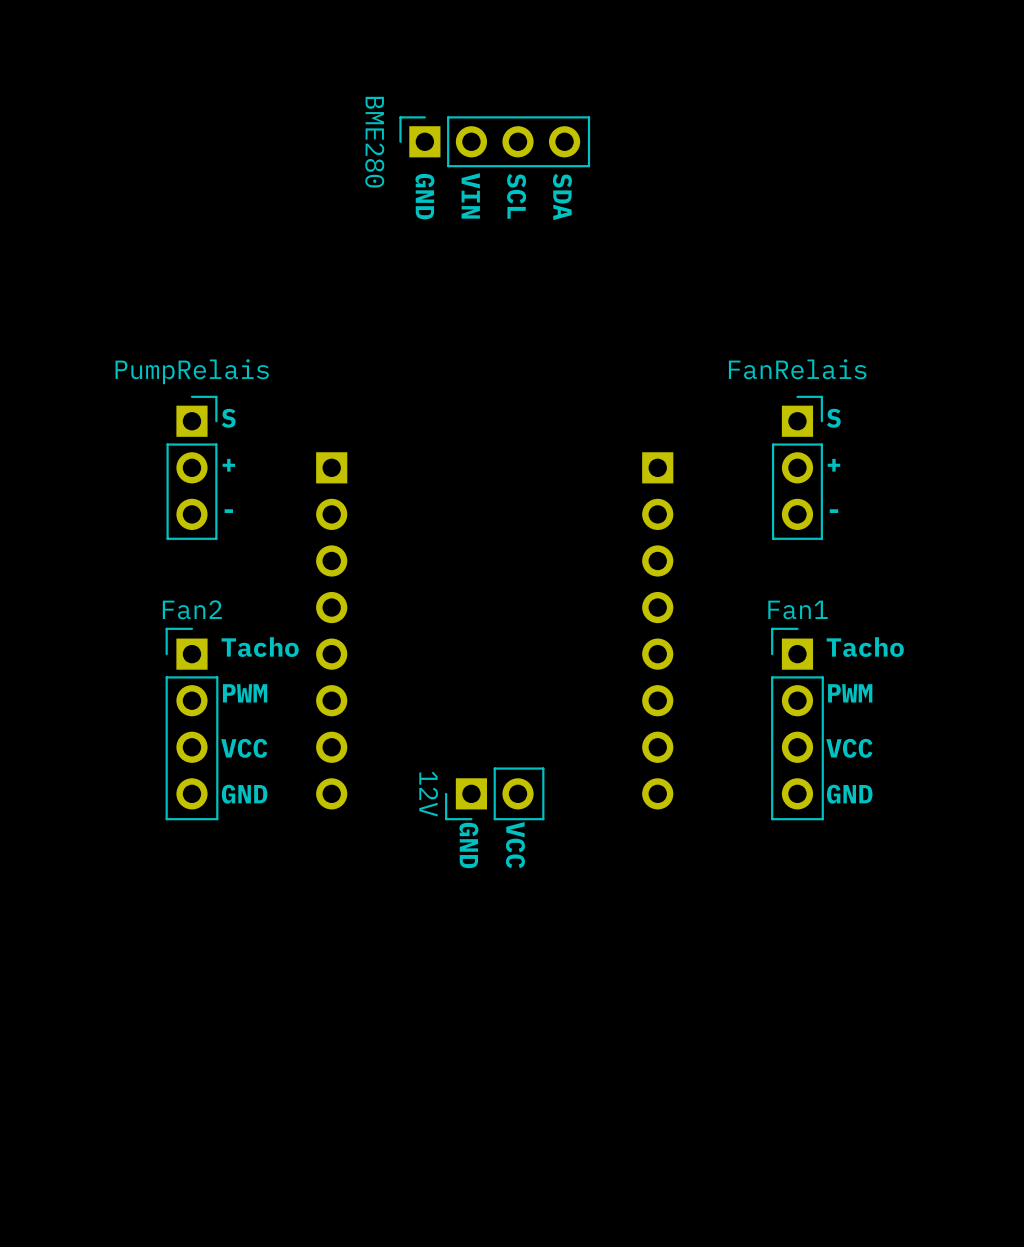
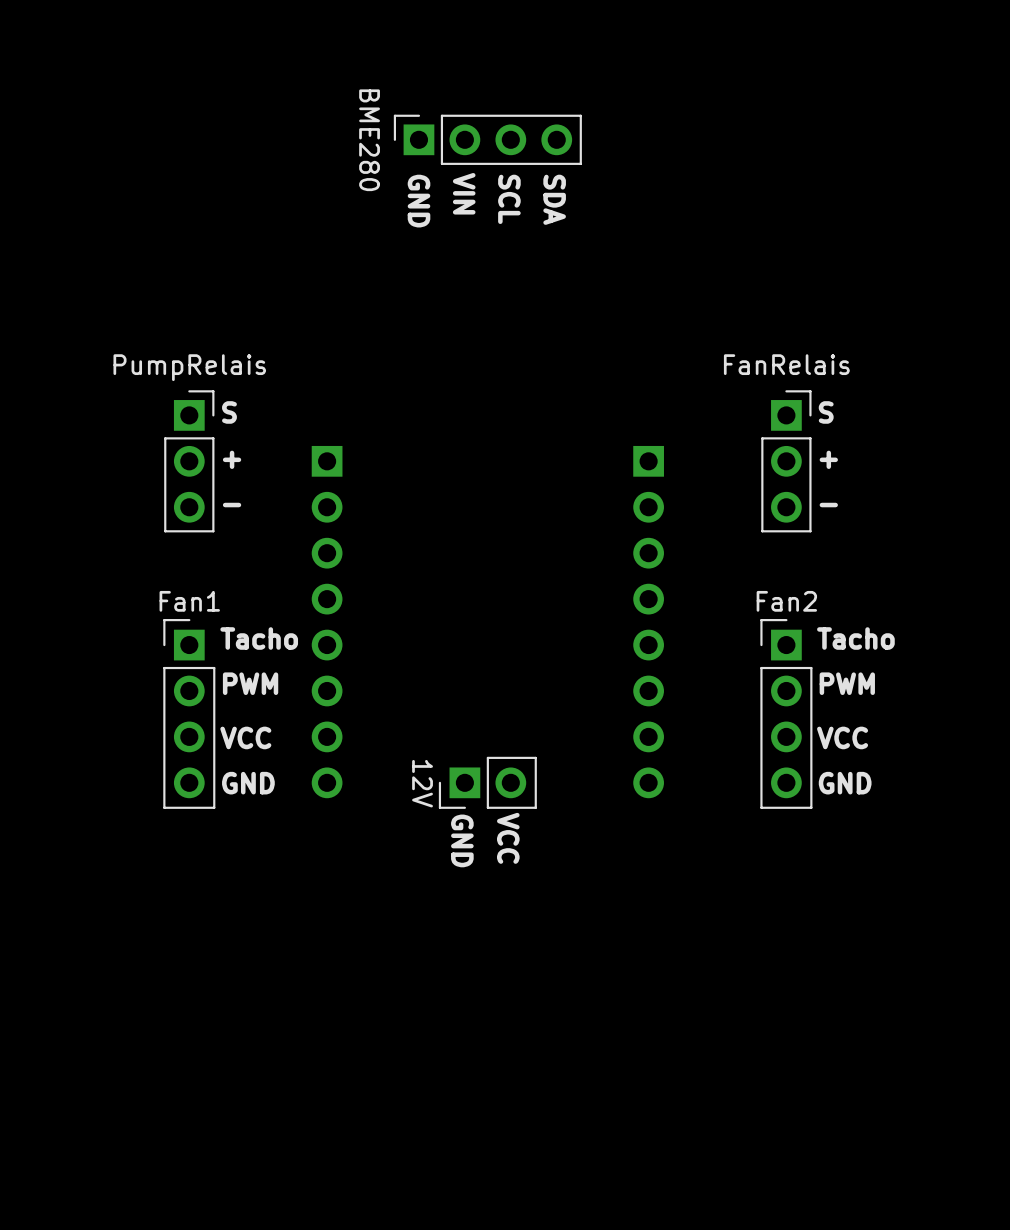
Fan2 name: Fan2 (192, 609) -> Fan1 (189, 601)
Fan1 name: Fan1 (798, 609) -> Fan2 (786, 601)

